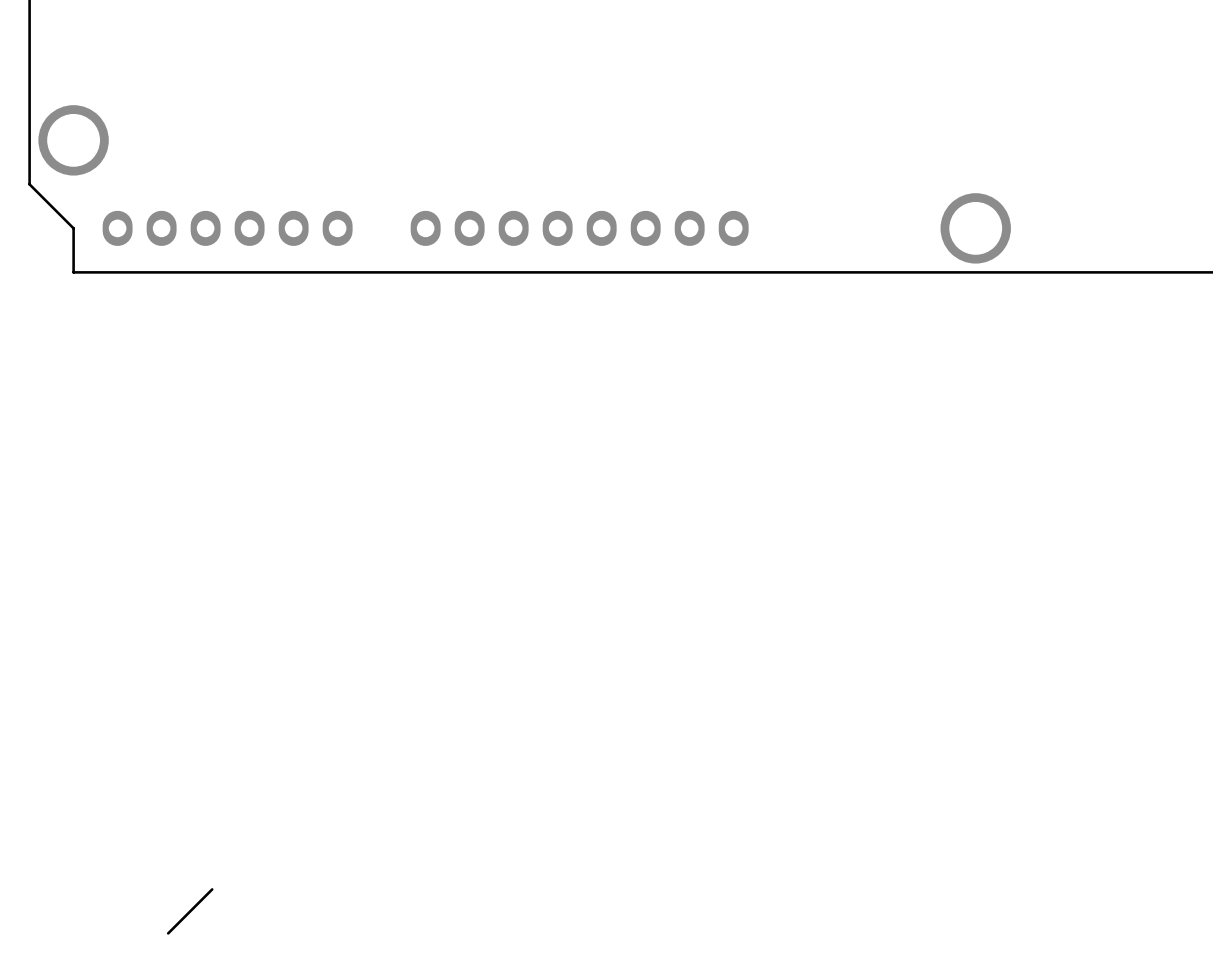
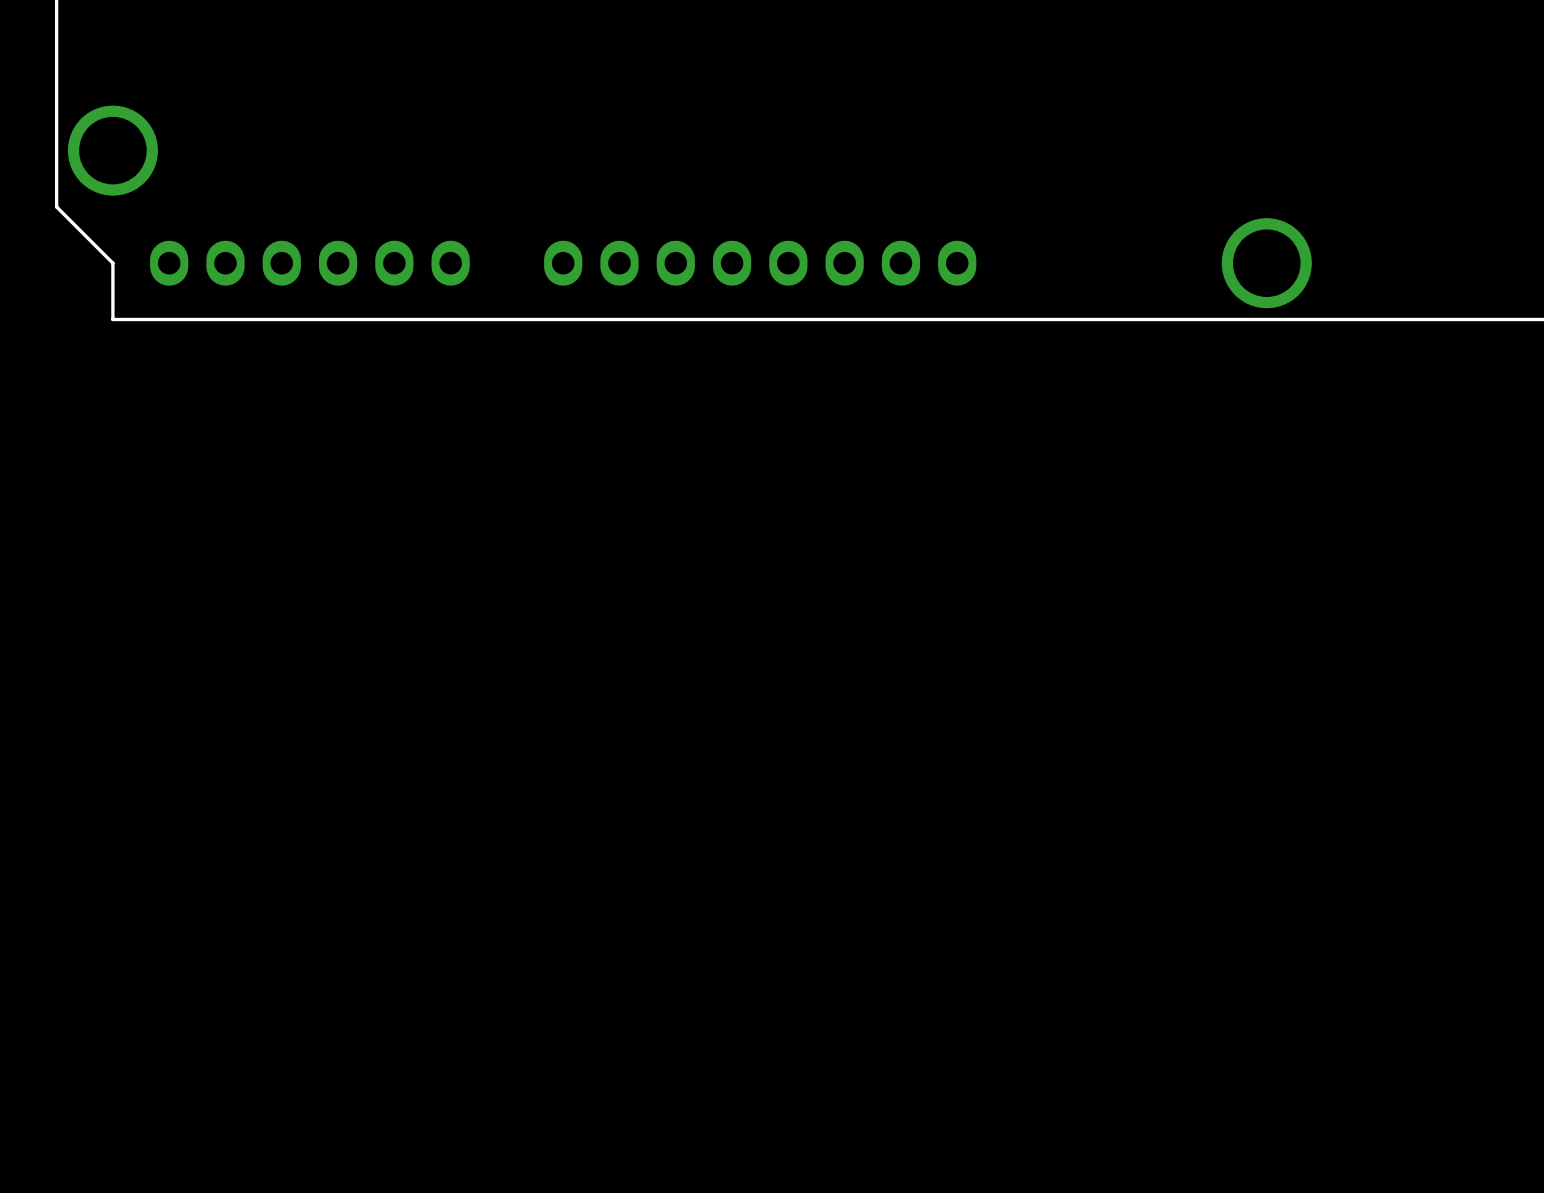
board edge: (212, 889) (168, 933) -> none

